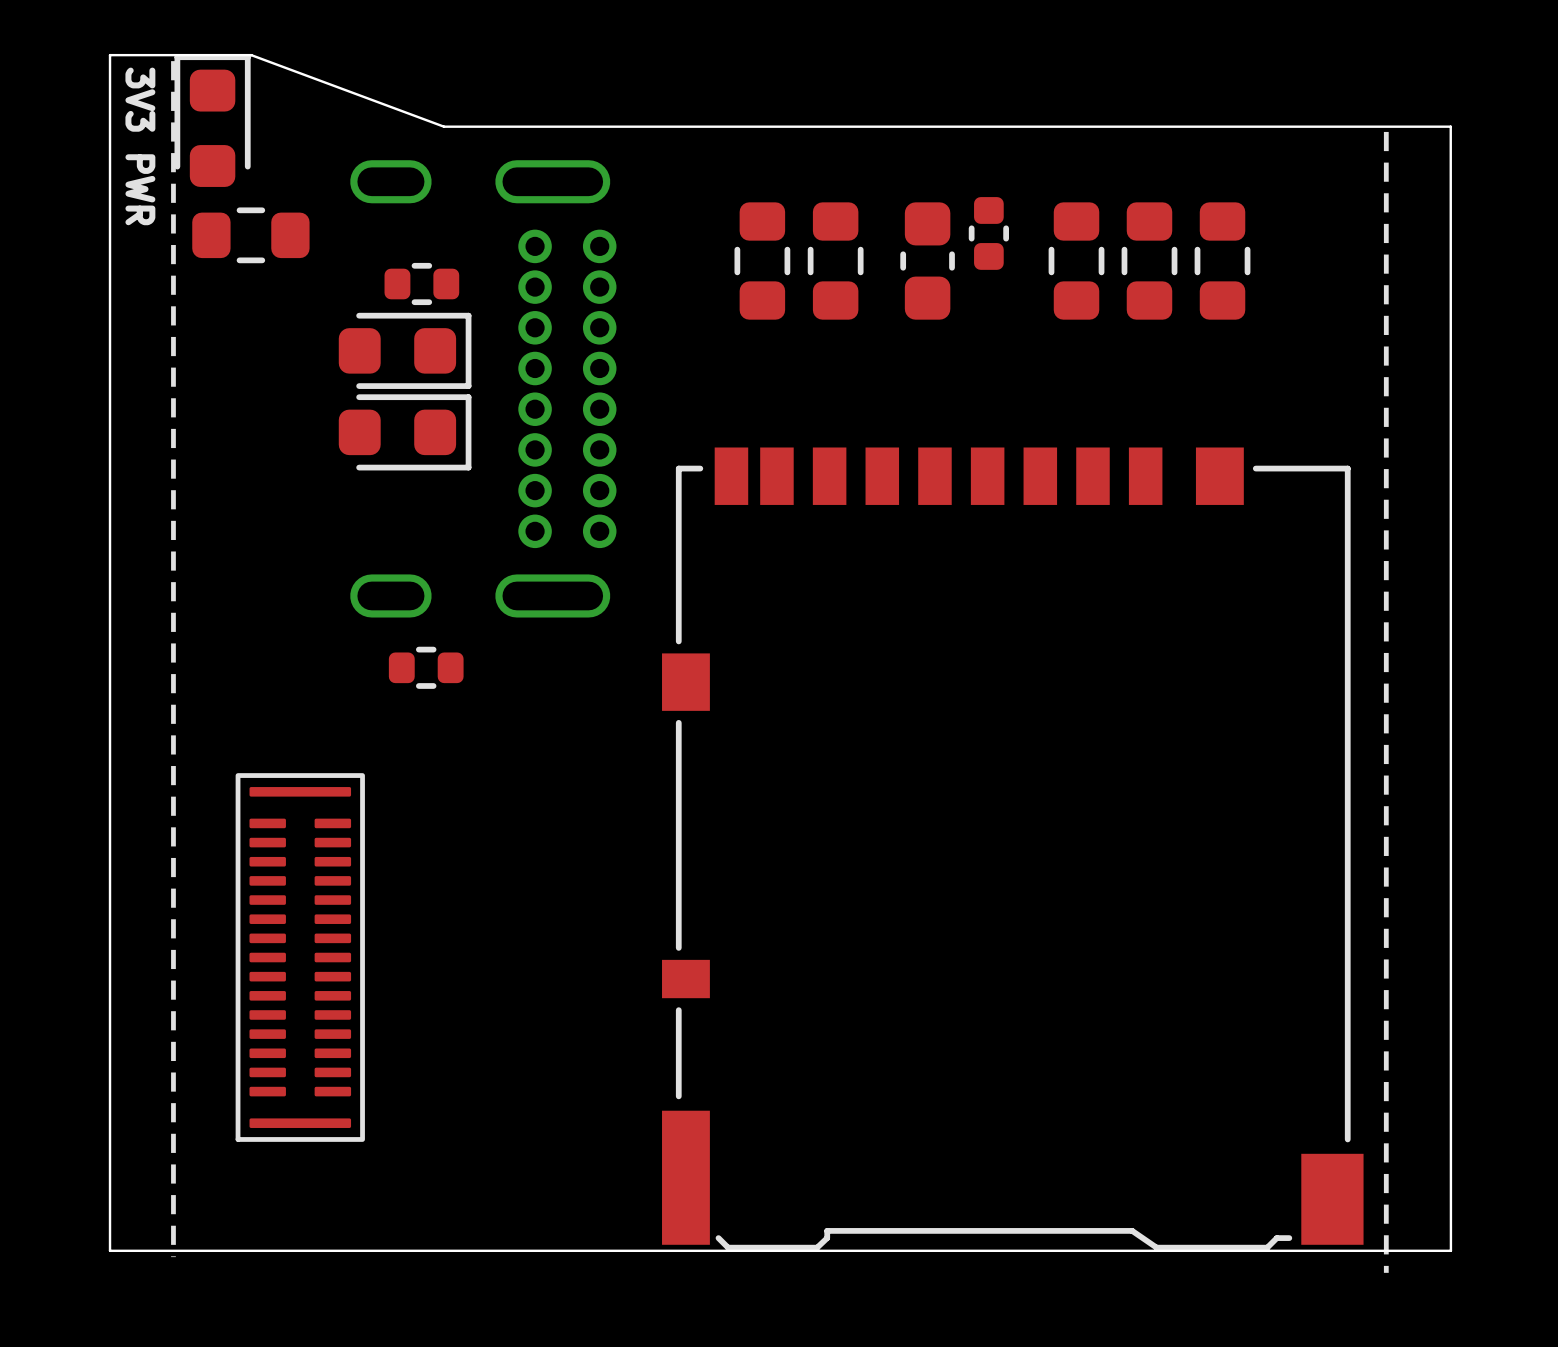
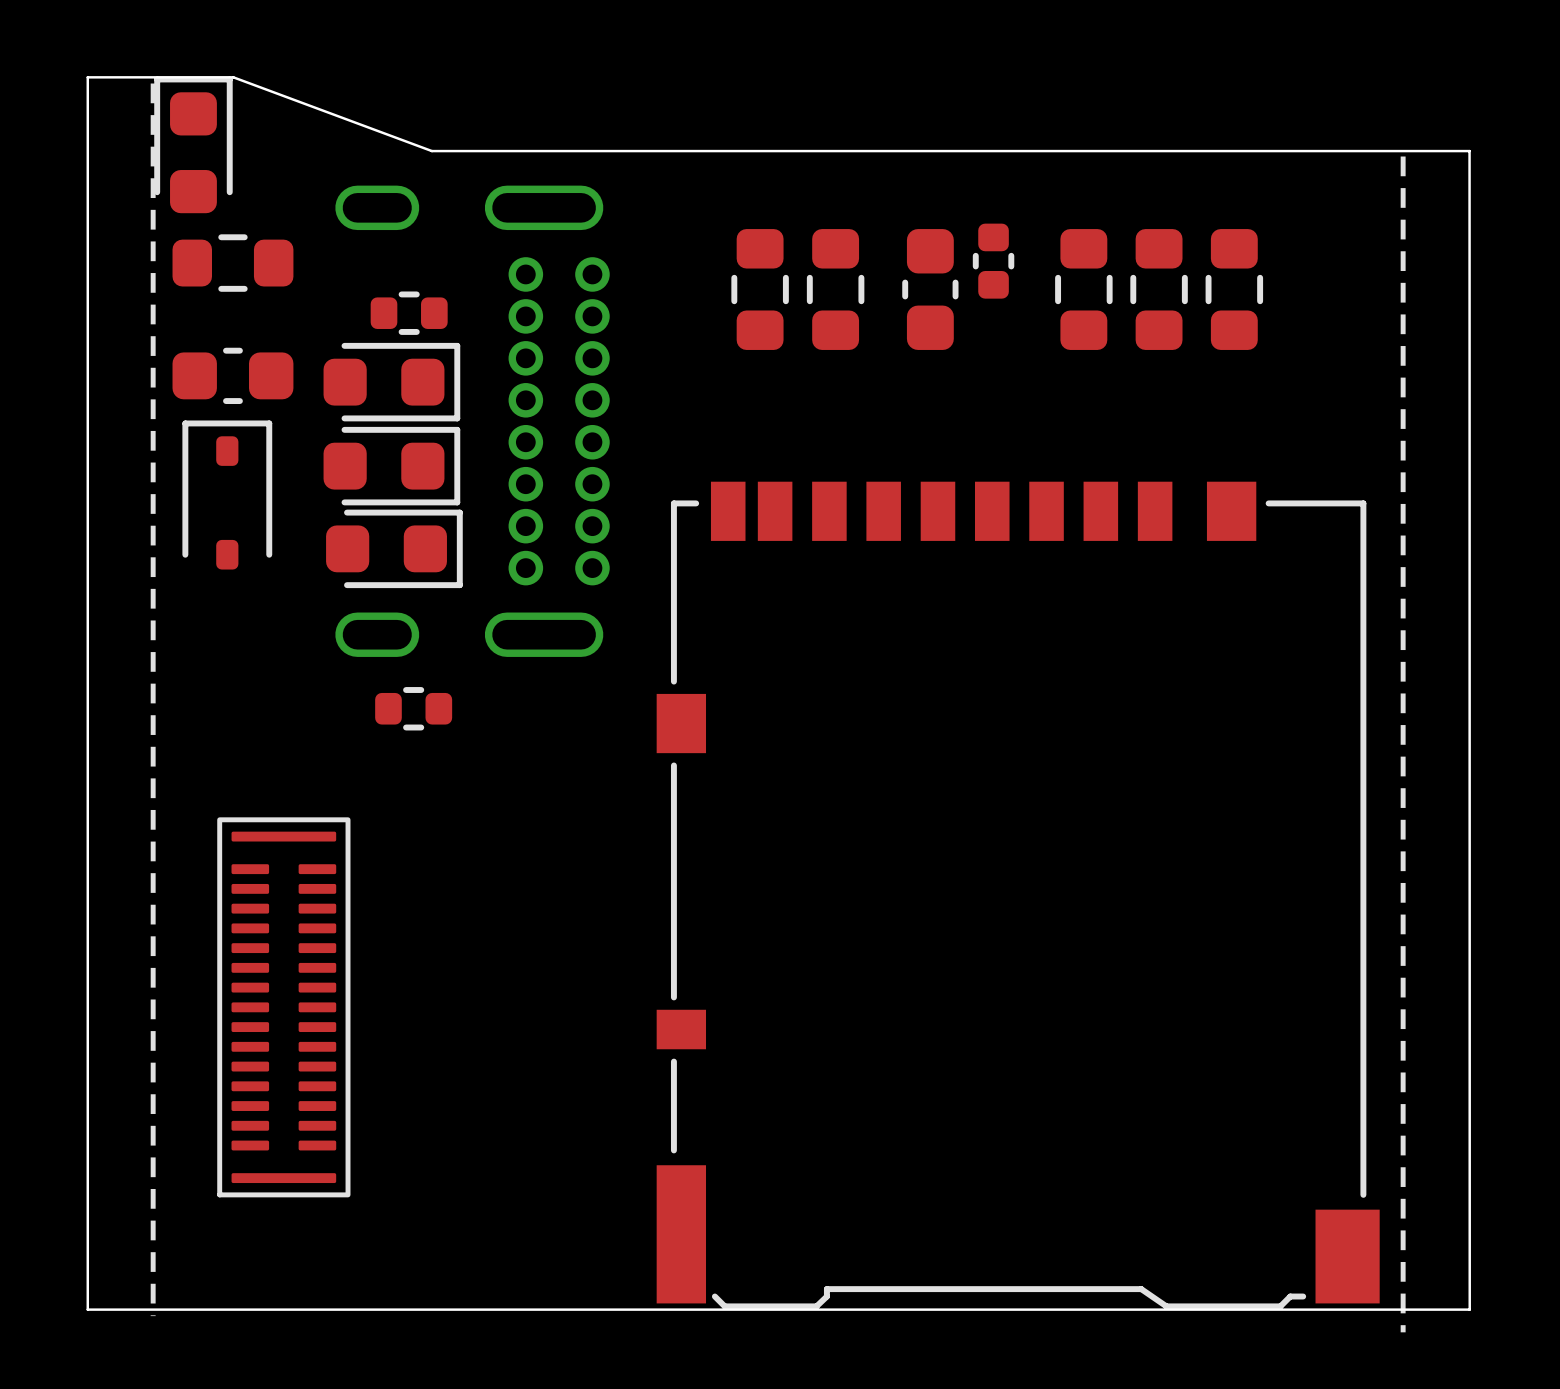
text: 3V3 PWR (140, 146) -> none
part: none -> (232, 375)
part: none -> (227, 495)
part: none -> (394, 548)

